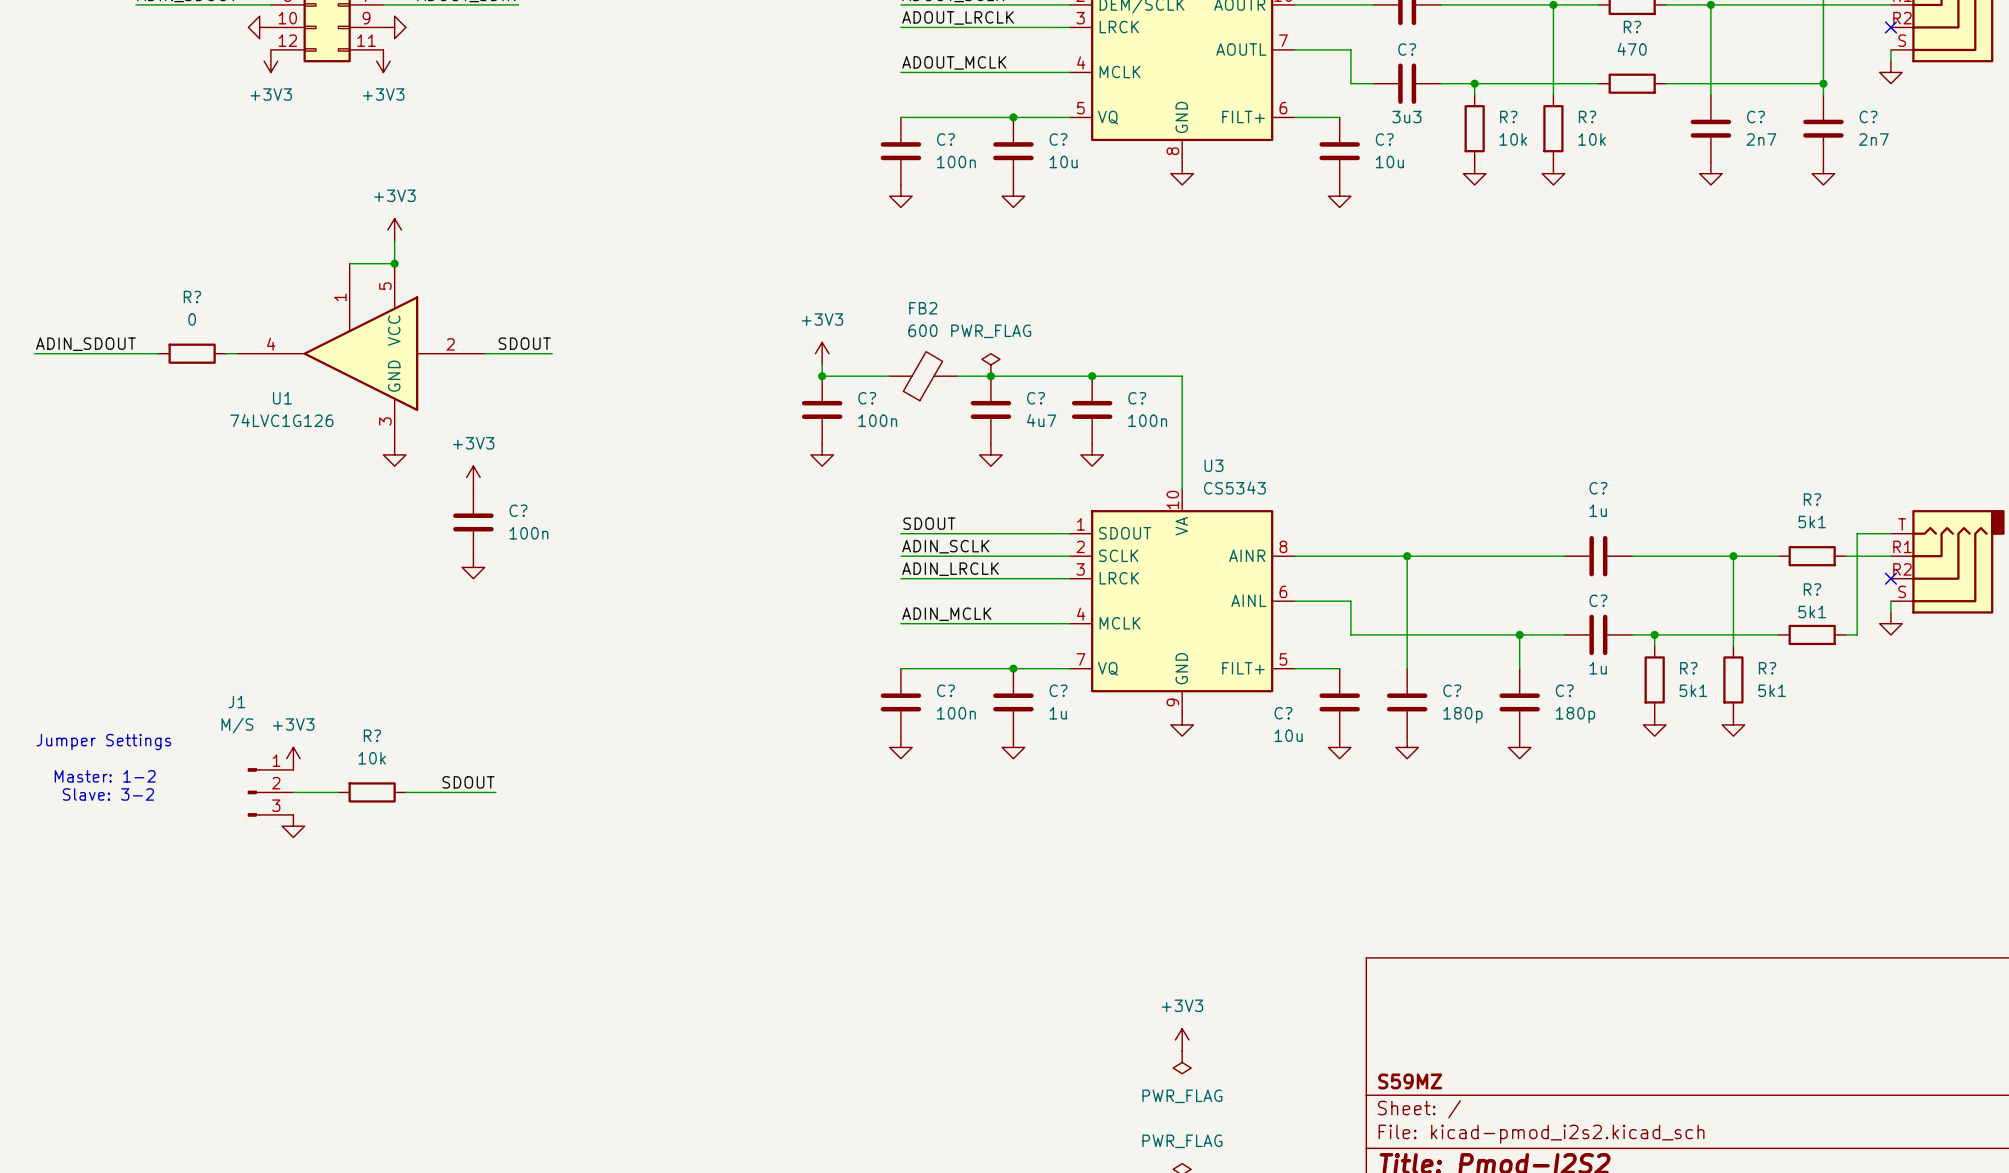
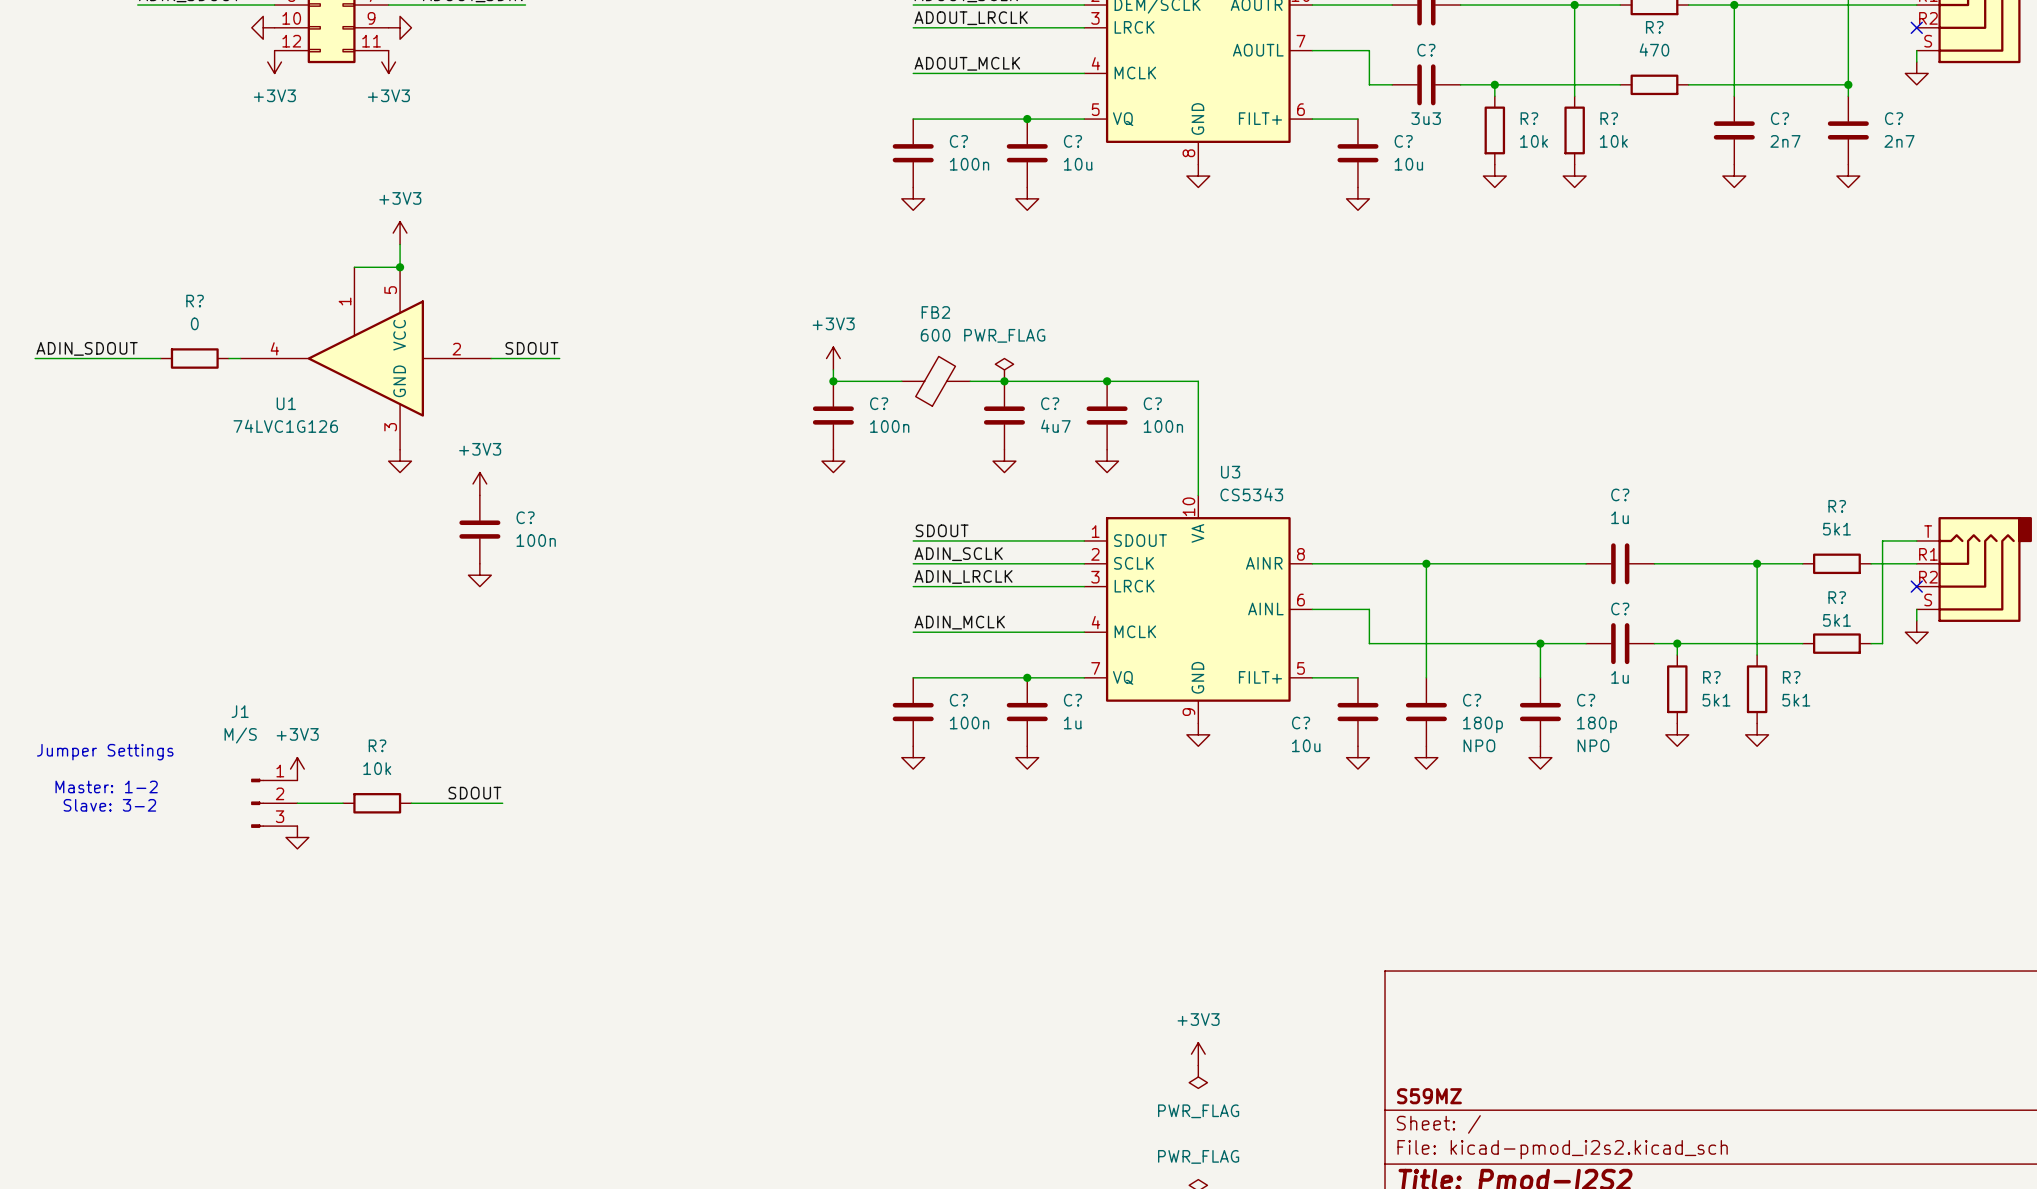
C? text: none -> NPO (1479, 745)
C? text: none -> NPO (1593, 745)

